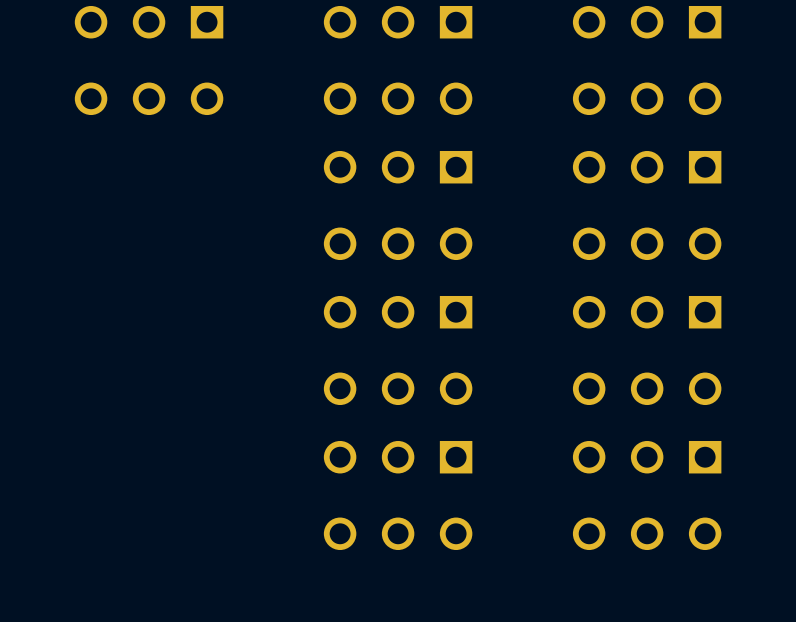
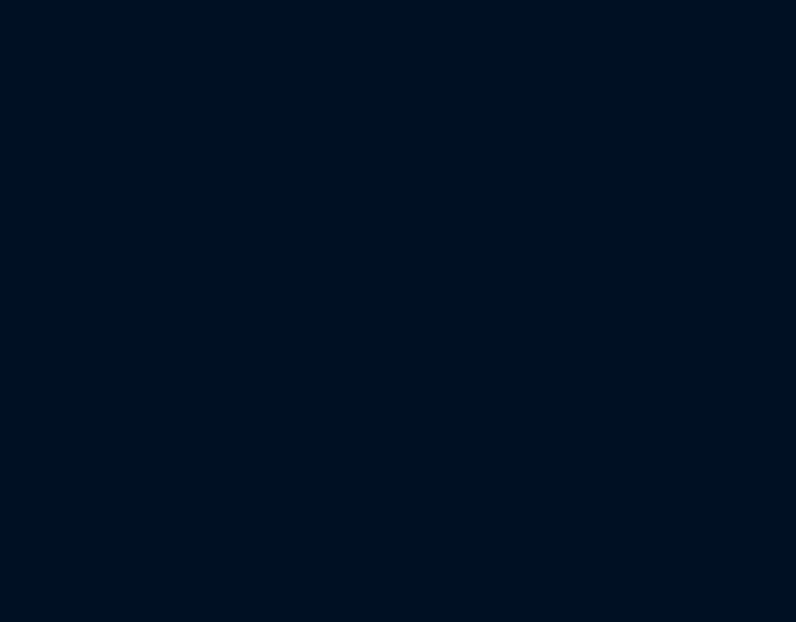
part: (149, 60) -> none
part: (398, 60) -> none
part: (647, 60) -> none
part: (398, 205) -> none
part: (647, 205) -> none
part: (398, 350) -> none
part: (647, 350) -> none
part: (398, 495) -> none
part: (647, 495) -> none

